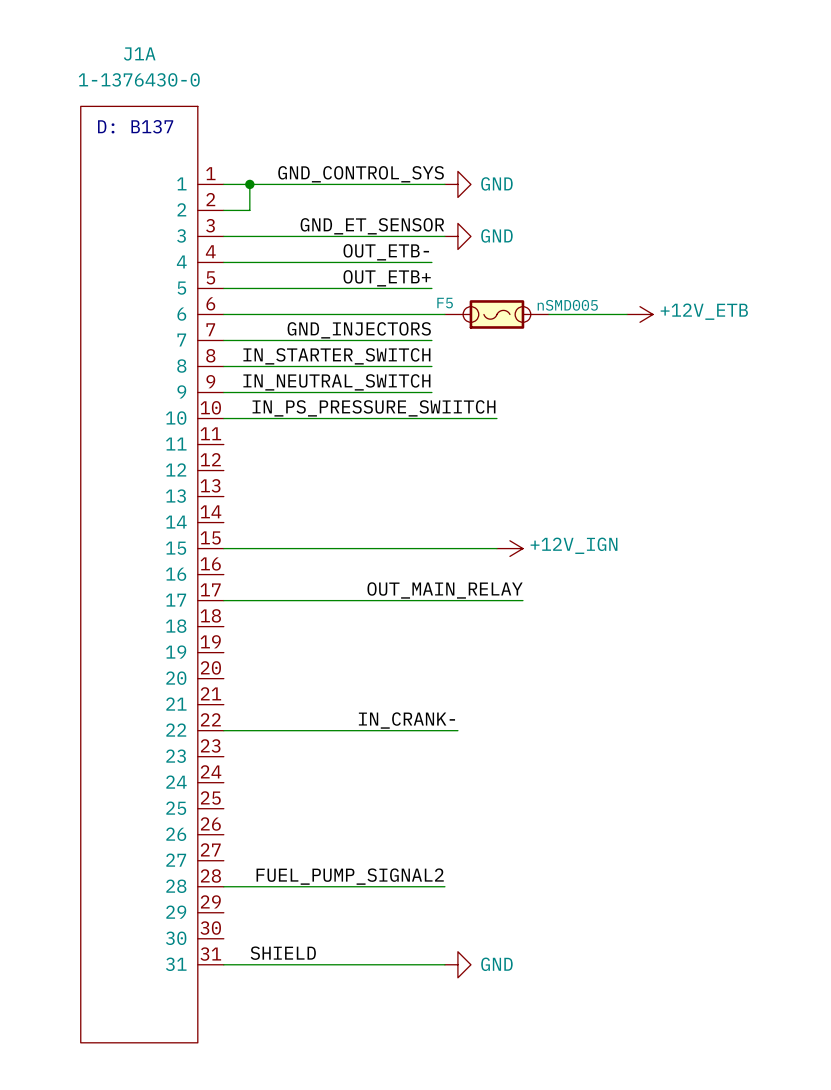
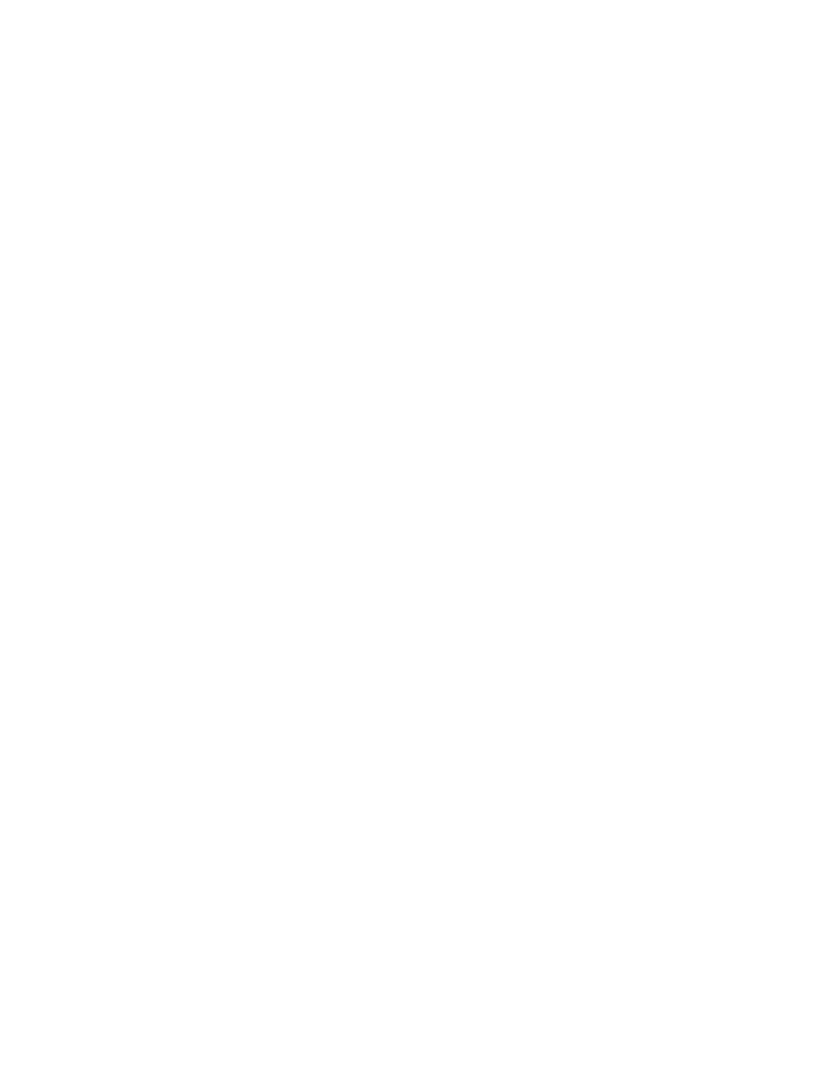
text: D: B137 (135, 126) -> none
label: GND_CONTROL_SYS (361, 174) -> none
wire: (223, 184) (444, 184) -> none
wire: (249, 184) (249, 210) (223, 210) -> none
junction: (249, 184) -> none
power symbol: GND (457, 184) -> none
label: GND_ET_SENSOR (372, 226) -> none
wire: (223, 236) (444, 236) -> none
power symbol: GND (457, 236) -> none
label: OUT_ETB- (386, 252) -> none
wire: (223, 262) (431, 262) -> none
label: OUT_ETB+ (387, 278) -> none
wire: (223, 288) (431, 288) -> none
wire: (223, 314) (444, 314) -> none
F5: nSMD005 (496, 314) -> none
wire: (548, 314) (627, 314) -> none
power symbol: +12V_ETB (640, 314) -> none
label: GND_INJECTORS (359, 330) -> none
wire: (223, 340) (431, 340) -> none
label: IN_STARTER_SWITCH (336, 356) -> none
wire: (223, 366) (431, 366) -> none
label: IN_NEUTRAL_SWITCH (336, 382) -> none
wire: (223, 392) (431, 392) -> none
label: IN_PS_PRESSURE_SWIITCH (374, 408) -> none
wire: (223, 418) (496, 418) -> none
wire: (223, 548) (496, 548) -> none
power symbol: +12V_IGN (509, 548) -> none
J1A: 1-1376430-0 (152, 574) -> none
label: OUT_MAIN_RELAY (445, 590) -> none
wire: (223, 600) (522, 600) -> none
label: IN_CRANK- (406, 720) -> none
wire: (223, 730) (457, 730) -> none
label: FUEL_PUMP_SIGNAL2 (350, 876) -> none
wire: (223, 886) (444, 886) -> none
label: SHIELD (283, 953) -> none
wire: (223, 964) (444, 964) -> none
power symbol: GND (457, 964) -> none

